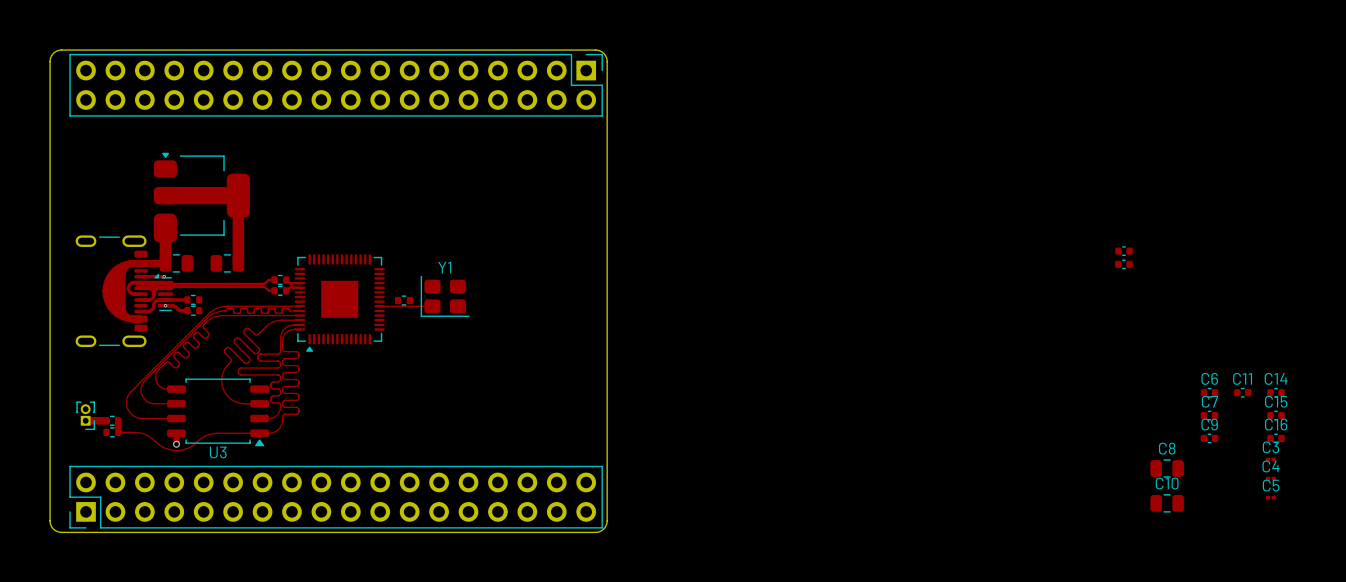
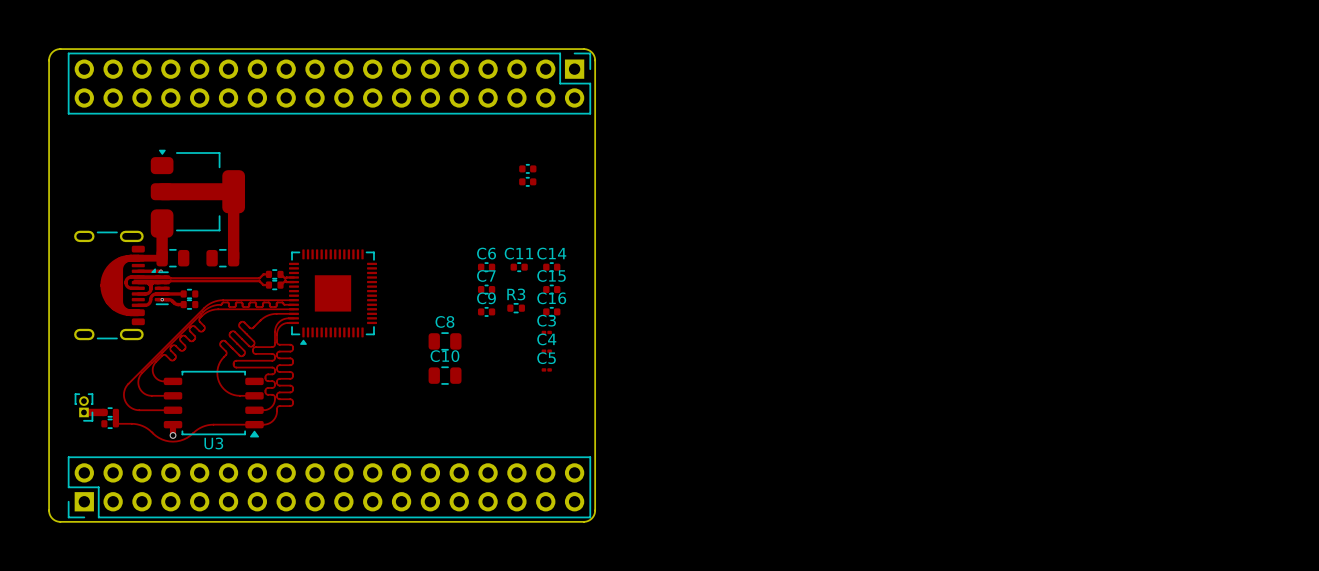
part: none -> (527, 168)
part: none -> (527, 181)
part: (1123, 251) -> none
part: (1123, 264) -> none
Y1: (445, 296) -> none
part: (403, 300) -> none
top track: (379, 306) (432, 306) -> none
R3: none -> (516, 308)
C6 position: (1209, 392) -> (486, 267)
C11 position: (1242, 392) -> (519, 267)
C14 position: (1276, 392) -> (551, 267)
C7 position: (1209, 415) -> (486, 289)
C15 position: (1276, 415) -> (551, 289)
C9 position: (1209, 438) -> (486, 311)
C16 position: (1276, 438) -> (551, 311)
C3 position: (1270, 459) -> (546, 332)
C8 position: (1167, 468) -> (445, 341)
C4 position: (1270, 478) -> (546, 351)
C5 position: (1270, 497) -> (546, 369)
C10 position: (1167, 503) -> (445, 375)

